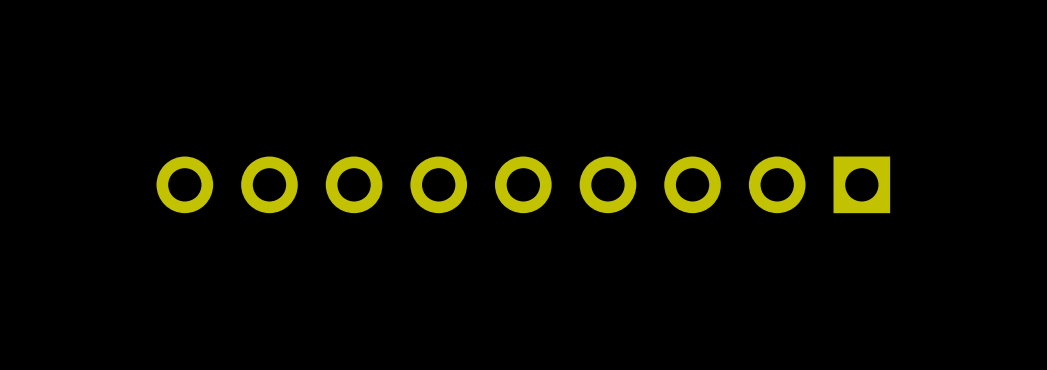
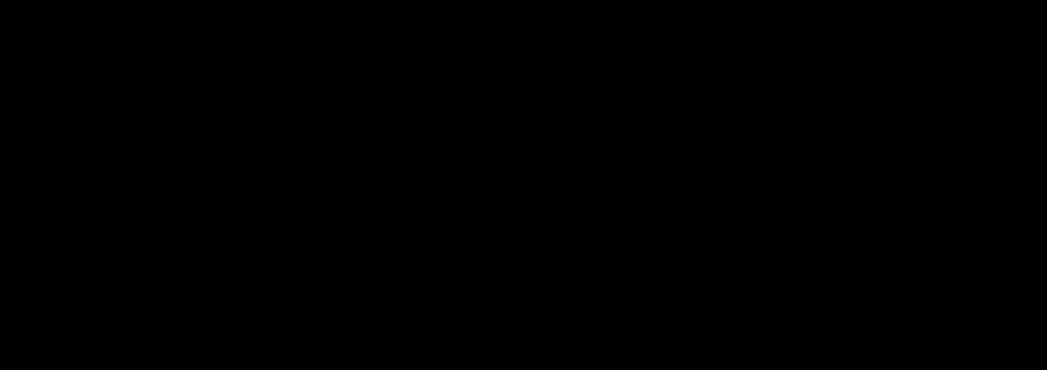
part: (523, 184) -> none

